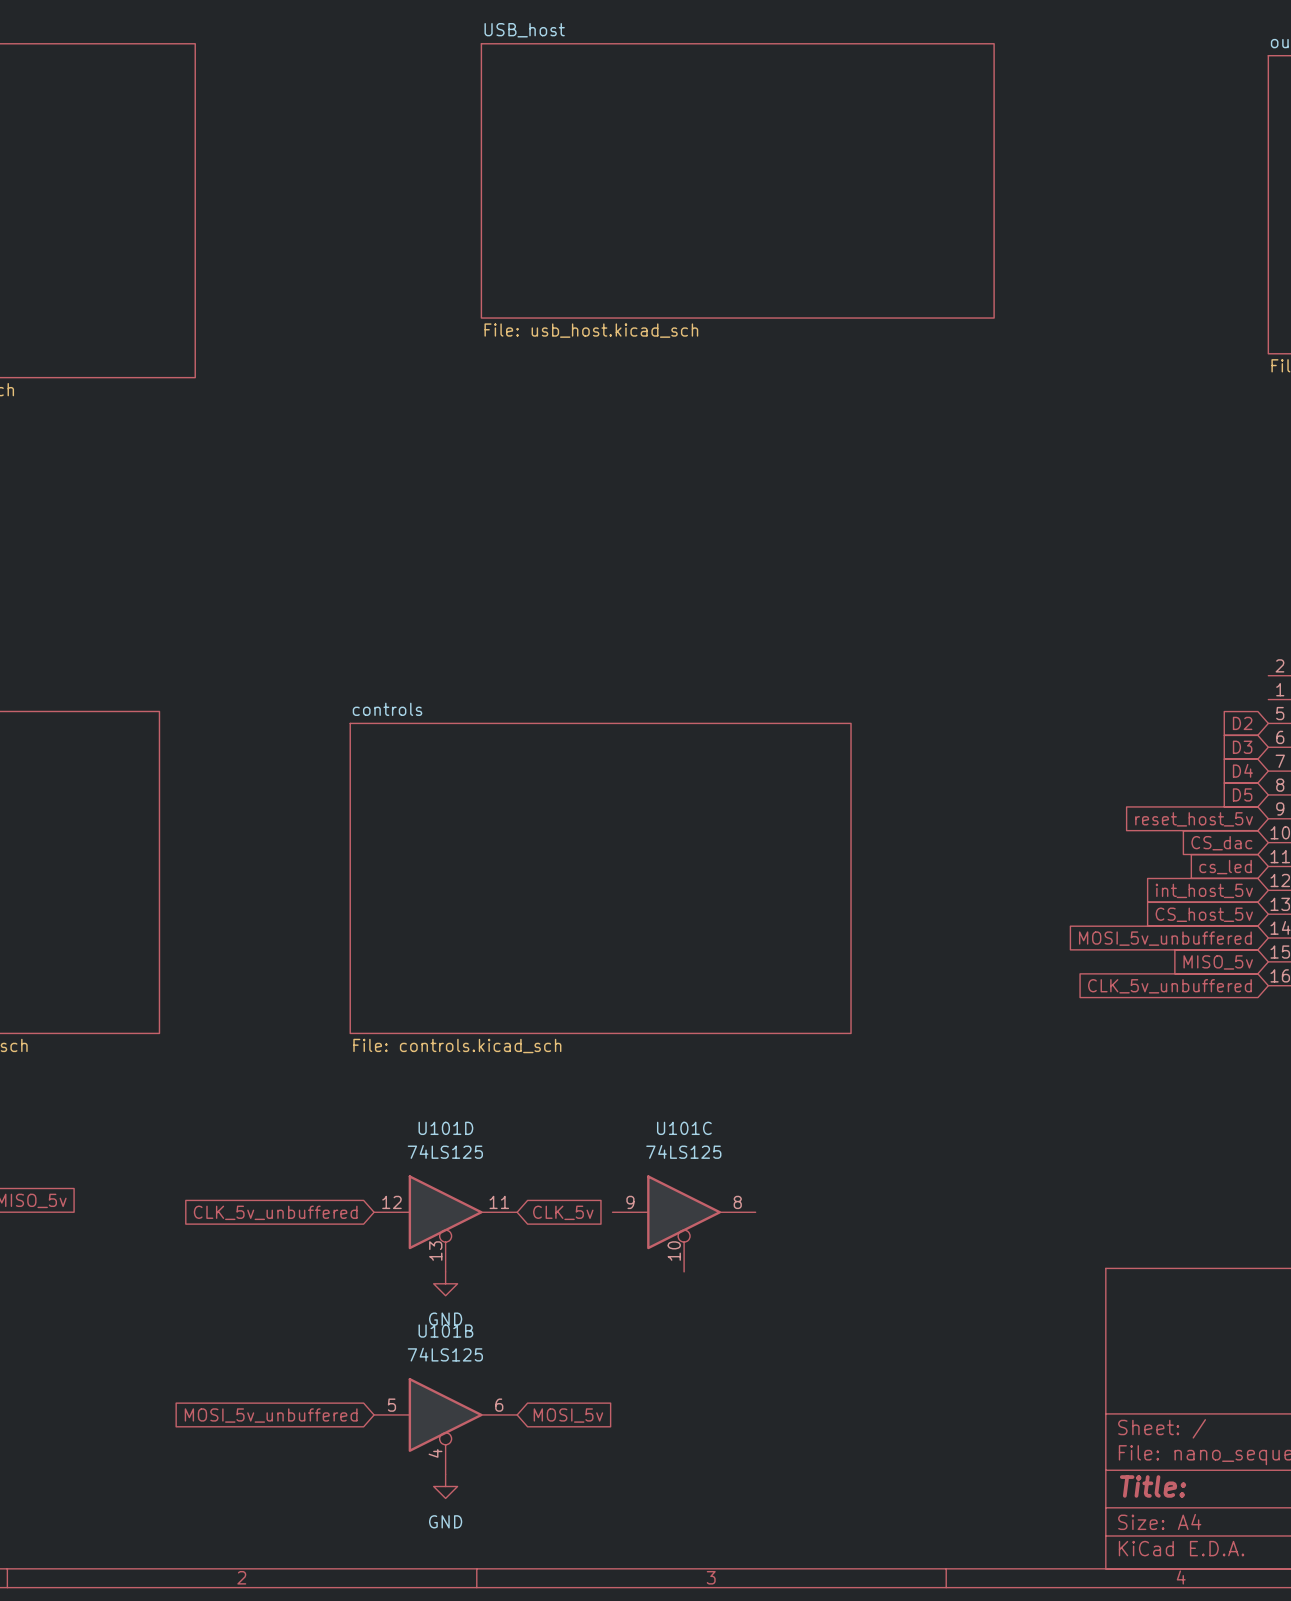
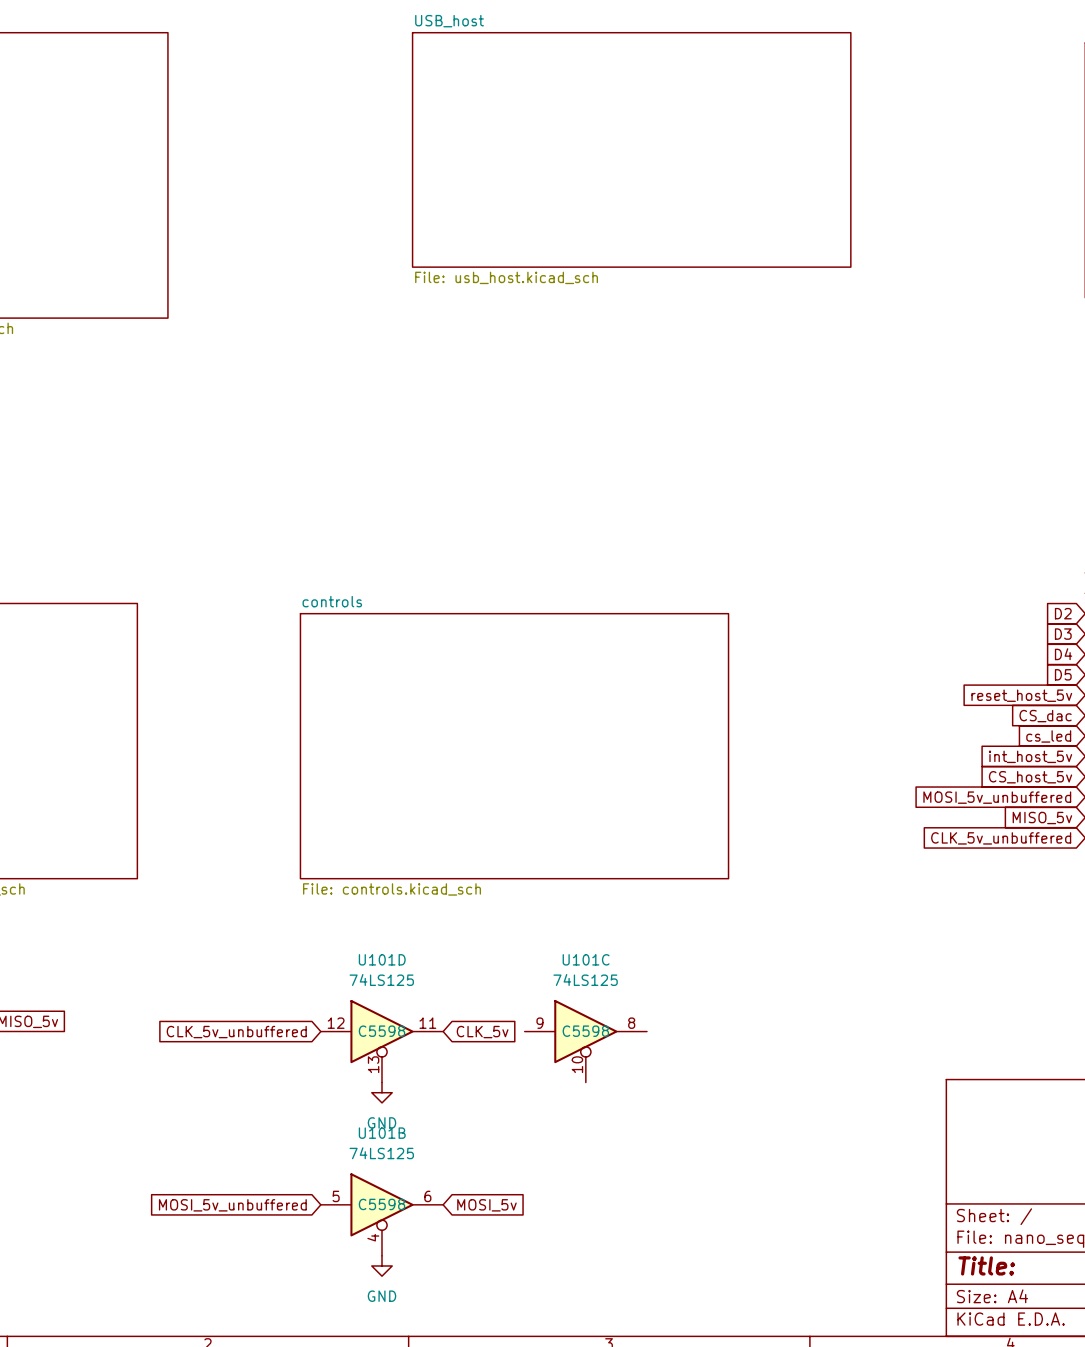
U101D text: none -> C5598 (381, 1031)
U101C text: none -> C5598 (585, 1031)
U101B text: none -> C5598 (381, 1204)

